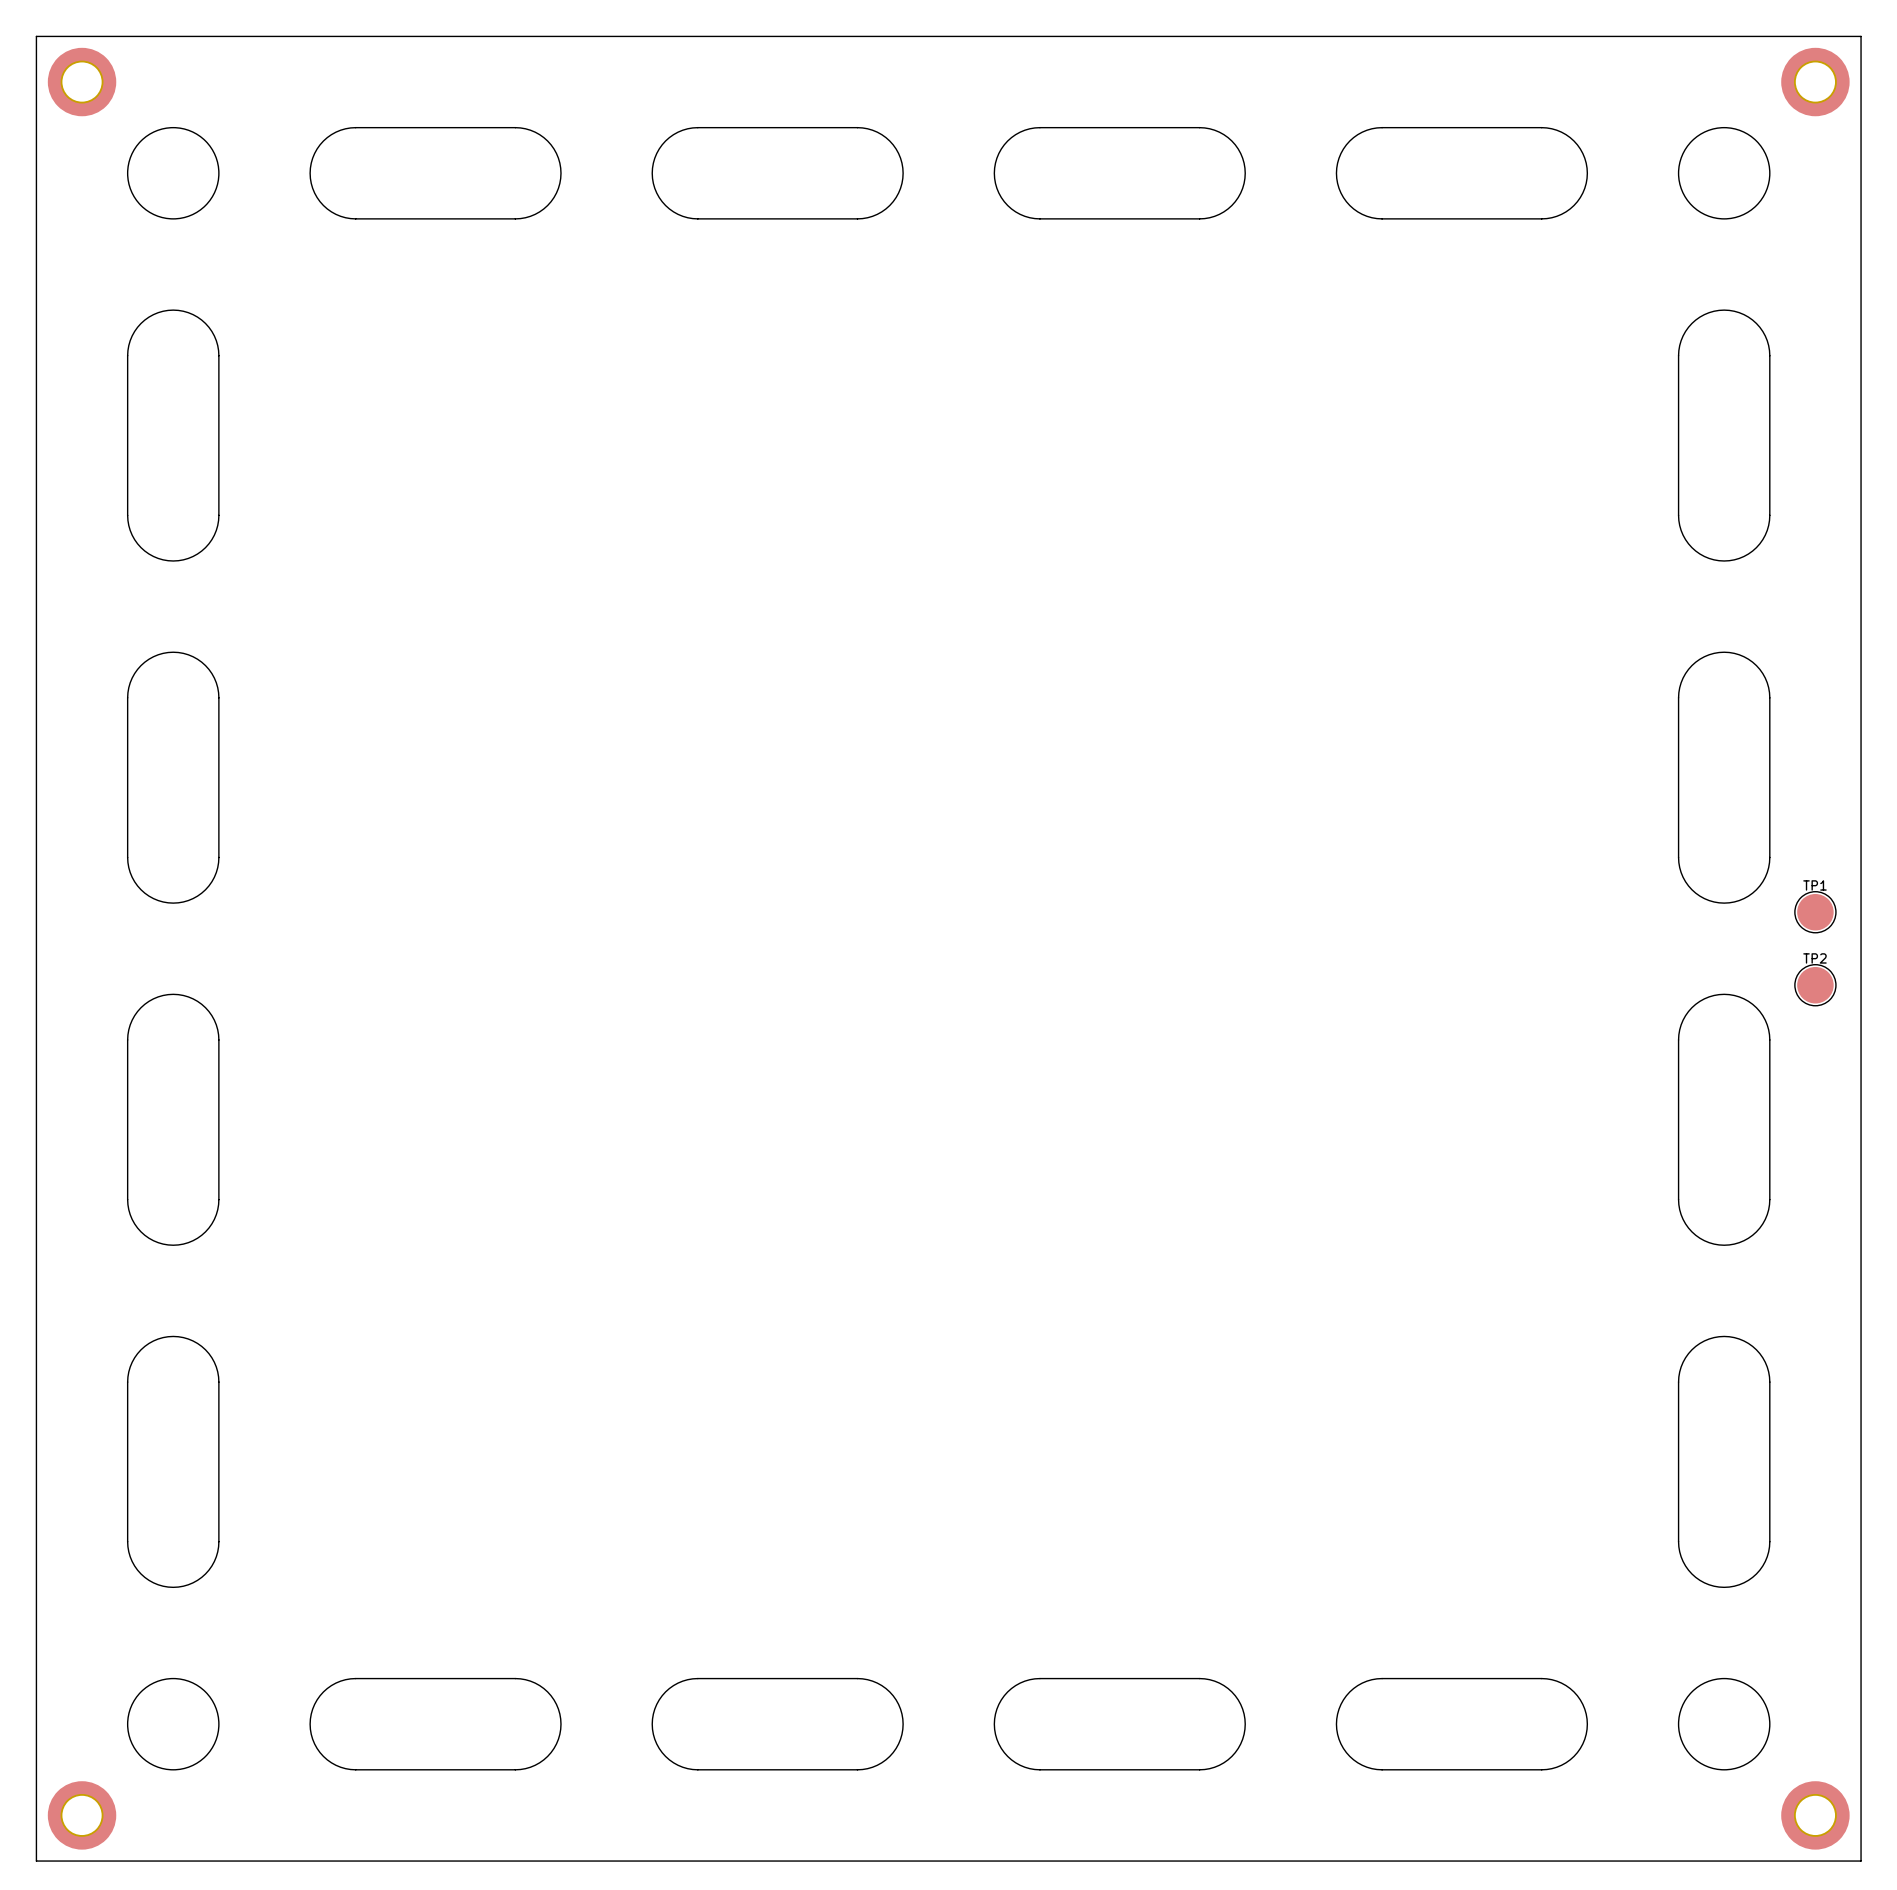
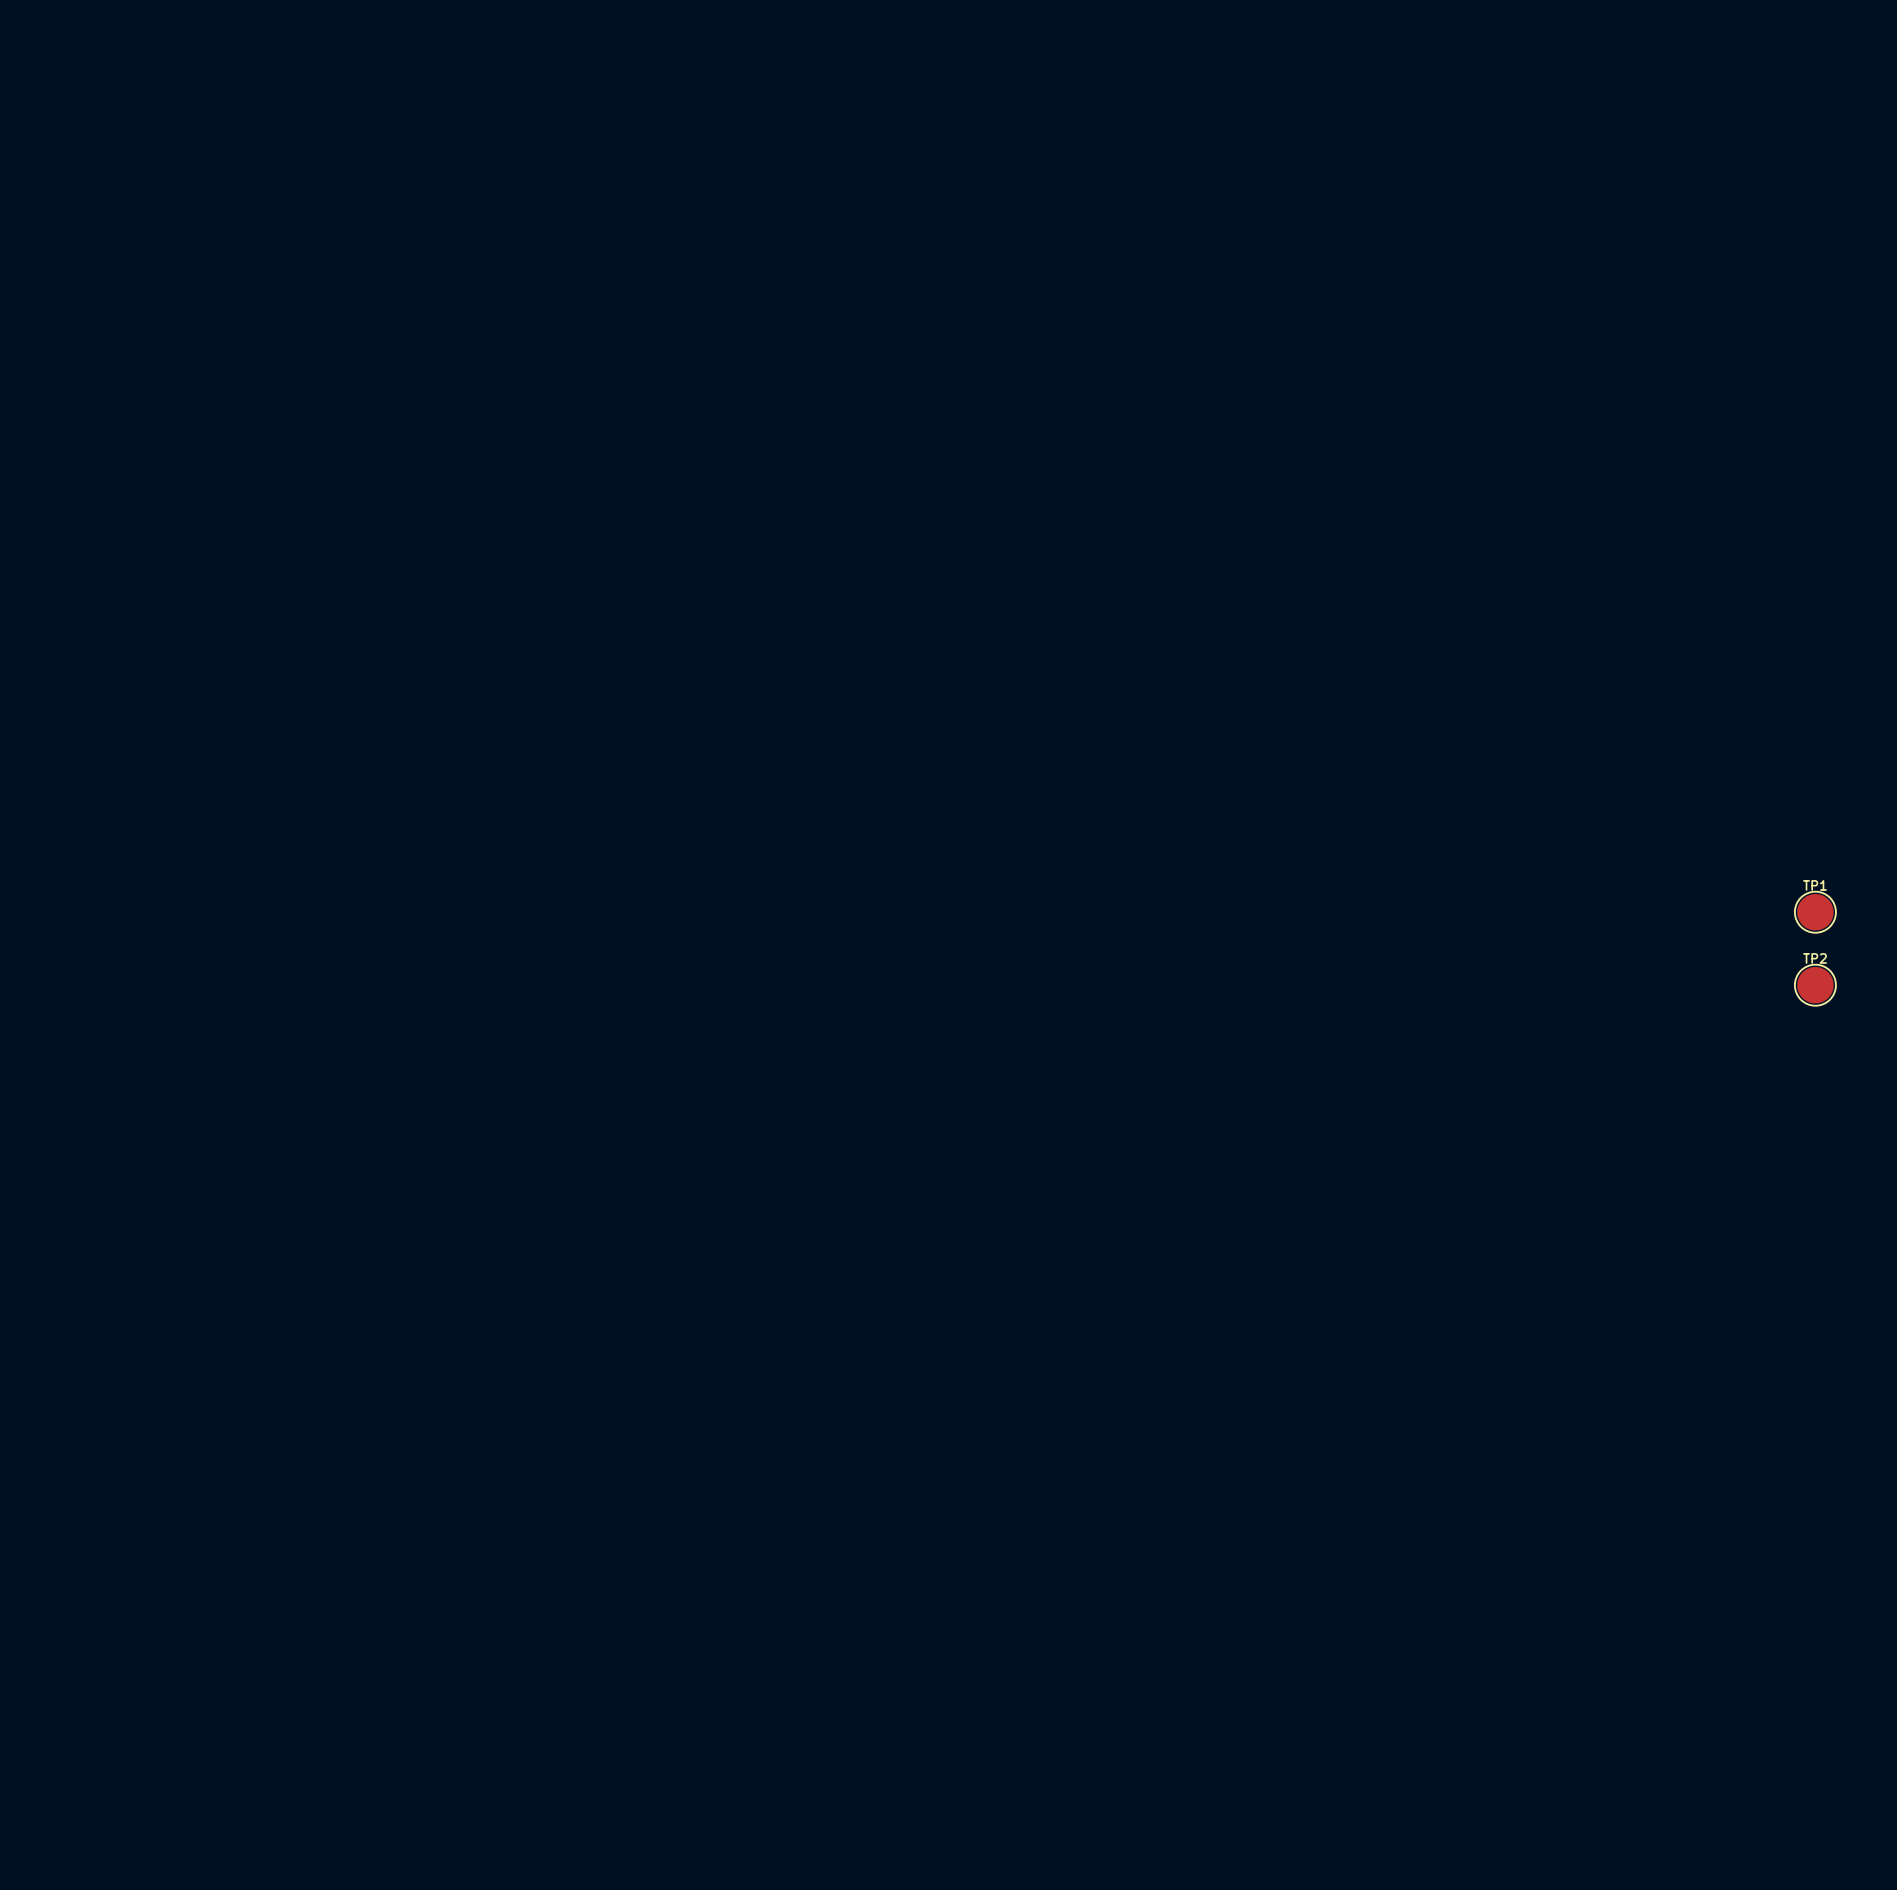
board edge: (36, 36) (1861, 36) (1861, 1861) (36, 1861) (36, 36) -> none
part: (82, 82) -> none
part: (1815, 82) -> none
round board edge: [127, 127, 220, 220] -> none
board edge: (355, 127) (525, 128) (539, 134) (554, 149) (560, 168) (559, 183) (556, 193) (547, 205) (535, 214) (520, 218) (345, 217) (331, 211) (317, 197) (311, 183) (310, 168) (314, 153) (323, 141) (340, 130) (355, 127) -> none
board edge: (697, 127) (867, 128) (881, 134) (896, 149) (902, 168) (901, 183) (898, 193) (889, 205) (877, 214) (862, 218) (687, 217) (673, 211) (659, 197) (653, 183) (652, 168) (656, 153) (665, 141) (682, 130) (697, 127) -> none
board edge: (1039, 127) (1209, 128) (1223, 134) (1238, 149) (1244, 168) (1244, 183) (1240, 193) (1231, 205) (1219, 214) (1204, 218) (1029, 217) (1015, 211) (1001, 197) (995, 183) (994, 168) (998, 153) (1007, 141) (1024, 130) (1039, 127) -> none
board edge: (1382, 127) (1551, 128) (1570, 137) (1580, 149) (1586, 163) (1586, 183) (1580, 197) (1570, 208) (1561, 214) (1546, 218) (1371, 217) (1357, 211) (1343, 197) (1337, 183) (1336, 168) (1340, 153) (1349, 141) (1367, 130) (1382, 127) -> none
round board edge: [1678, 127, 1771, 220] -> none
board edge: (127, 355) (128, 525) (134, 539) (149, 554) (168, 560) (183, 559) (197, 554) (205, 547) (214, 535) (218, 520) (217, 345) (211, 331) (197, 317) (183, 311) (168, 310) (153, 314) (141, 323) (130, 340) (127, 355) -> none
board edge: (1678, 355) (1679, 525) (1688, 543) (1699, 554) (1719, 560) (1734, 559) (1743, 556) (1756, 547) (1765, 535) (1769, 520) (1768, 345) (1762, 331) (1752, 320) (1734, 311) (1719, 310) (1704, 314) (1691, 323) (1681, 340) (1678, 355) -> none
board edge: (127, 697) (128, 867) (134, 881) (149, 896) (168, 902) (183, 901) (193, 898) (205, 889) (214, 877) (218, 862) (217, 687) (211, 673) (197, 659) (183, 653) (168, 652) (153, 656) (141, 665) (130, 682) (127, 697) -> none
board edge: (1678, 697) (1679, 867) (1685, 881) (1699, 896) (1719, 902) (1734, 901) (1743, 898) (1756, 889) (1765, 877) (1769, 862) (1768, 687) (1762, 673) (1752, 662) (1734, 653) (1719, 652) (1704, 656) (1691, 665) (1681, 682) (1678, 697) -> none
board edge: (127, 1039) (128, 1209) (134, 1223) (149, 1238) (168, 1244) (183, 1244) (193, 1240) (205, 1231) (214, 1219) (218, 1204) (217, 1029) (211, 1015) (197, 1001) (183, 995) (168, 994) (153, 998) (141, 1007) (130, 1024) (127, 1039) -> none
board edge: (1678, 1039) (1679, 1209) (1685, 1223) (1699, 1238) (1719, 1244) (1734, 1244) (1743, 1240) (1756, 1231) (1765, 1219) (1769, 1204) (1768, 1029) (1762, 1015) (1752, 1004) (1739, 996) (1719, 994) (1704, 998) (1691, 1007) (1681, 1024) (1678, 1039) -> none
board edge: (127, 1382) (128, 1551) (134, 1565) (149, 1580) (168, 1587) (183, 1586) (193, 1582) (205, 1573) (214, 1561) (218, 1546) (217, 1371) (211, 1357) (197, 1343) (183, 1337) (168, 1336) (153, 1340) (141, 1349) (130, 1367) (127, 1382) -> none
board edge: (1678, 1382) (1679, 1551) (1685, 1565) (1699, 1580) (1719, 1587) (1734, 1586) (1743, 1582) (1756, 1573) (1765, 1561) (1769, 1546) (1768, 1371) (1762, 1357) (1752, 1346) (1739, 1339) (1719, 1336) (1704, 1340) (1691, 1349) (1681, 1367) (1678, 1382) -> none
round board edge: [127, 1678, 220, 1771] -> none
board edge: (355, 1678) (525, 1679) (539, 1685) (554, 1699) (560, 1719) (559, 1734) (554, 1748) (547, 1756) (535, 1765) (520, 1769) (345, 1768) (331, 1762) (317, 1748) (311, 1734) (310, 1719) (314, 1704) (323, 1691) (340, 1681) (355, 1678) -> none
board edge: (697, 1678) (867, 1679) (881, 1685) (896, 1699) (902, 1719) (901, 1734) (896, 1748) (889, 1756) (877, 1765) (862, 1769) (687, 1768) (673, 1762) (659, 1748) (653, 1734) (652, 1719) (656, 1704) (665, 1691) (682, 1681) (697, 1678) -> none
board edge: (1039, 1678) (1209, 1679) (1223, 1685) (1238, 1699) (1244, 1719) (1244, 1734) (1238, 1748) (1231, 1756) (1219, 1765) (1204, 1769) (1029, 1768) (1015, 1762) (1001, 1748) (995, 1734) (994, 1719) (998, 1704) (1007, 1691) (1024, 1681) (1039, 1678) -> none
board edge: (1382, 1678) (1551, 1679) (1570, 1688) (1580, 1699) (1586, 1714) (1586, 1734) (1580, 1748) (1573, 1756) (1561, 1765) (1546, 1769) (1371, 1768) (1357, 1762) (1343, 1748) (1337, 1734) (1336, 1719) (1340, 1704) (1349, 1691) (1367, 1681) (1382, 1678) -> none
round board edge: [1678, 1678, 1771, 1771] -> none
part: (82, 1815) -> none
part: (1815, 1815) -> none

